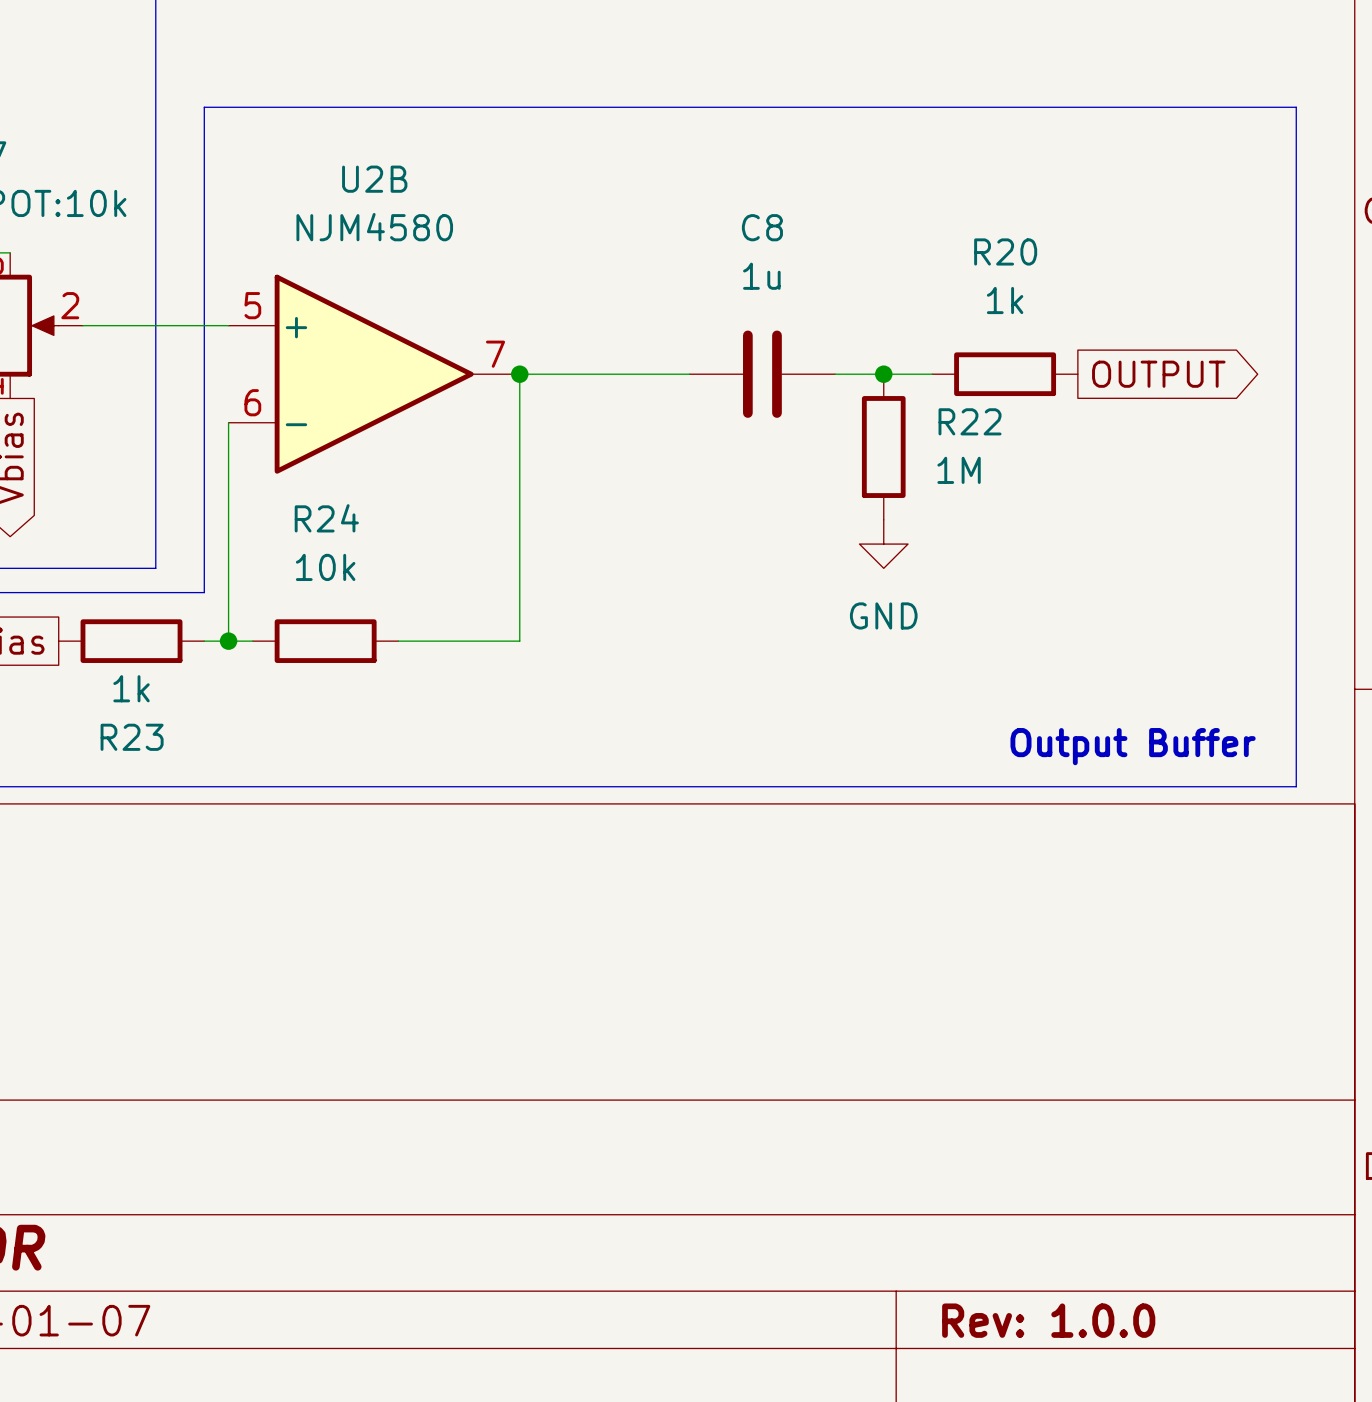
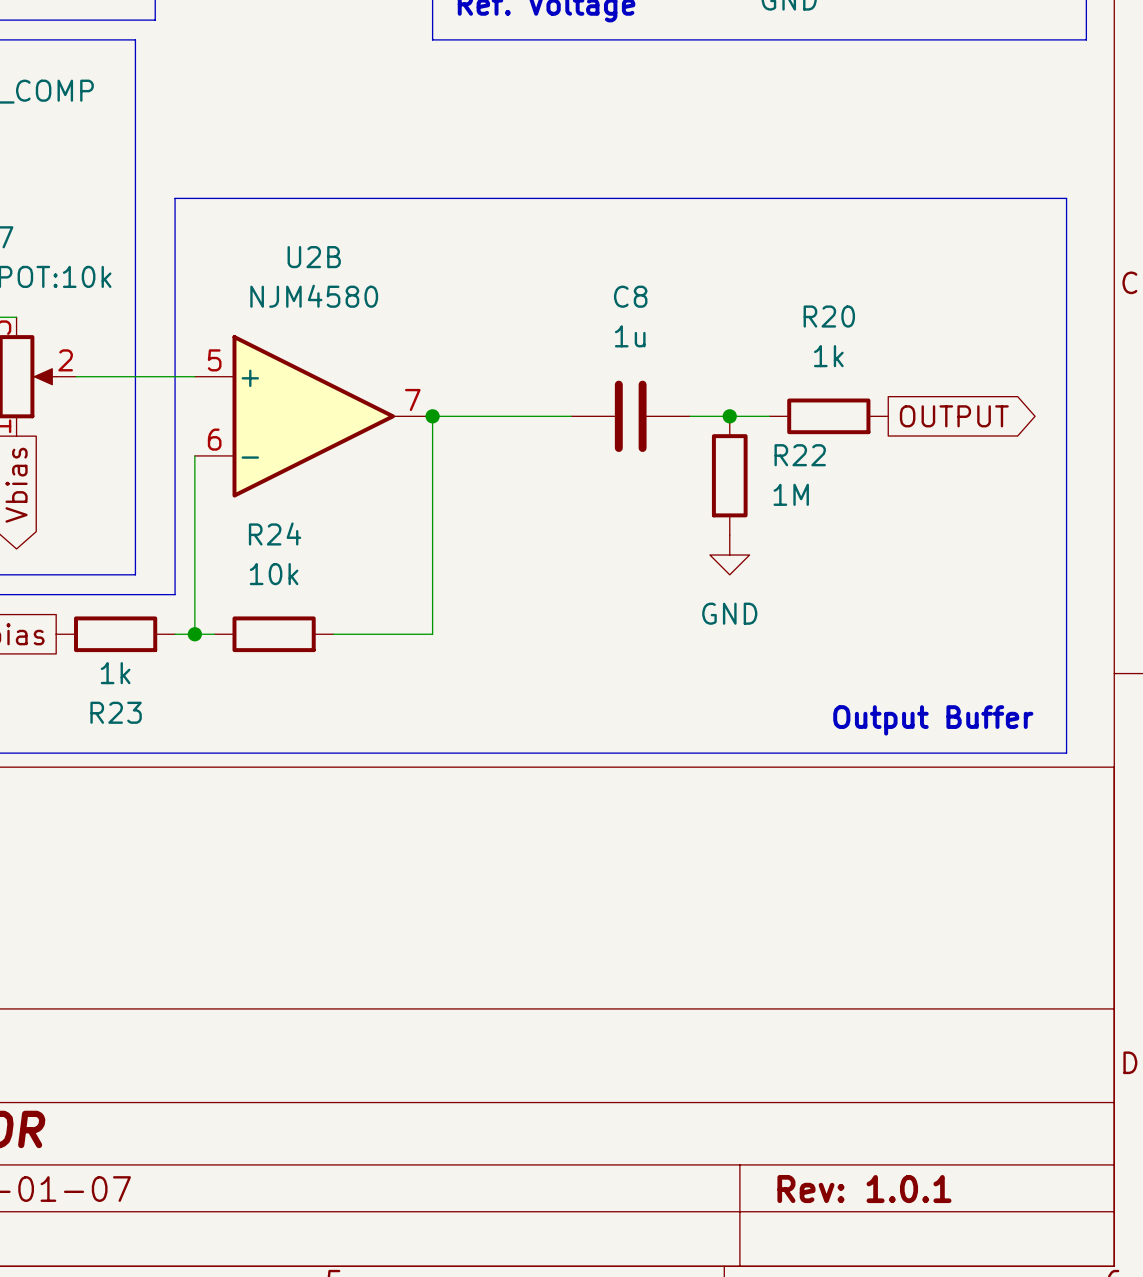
title block: Rev: 1.0.0 (1048, 1320) -> Rev: 1.0.1 (864, 1189)

